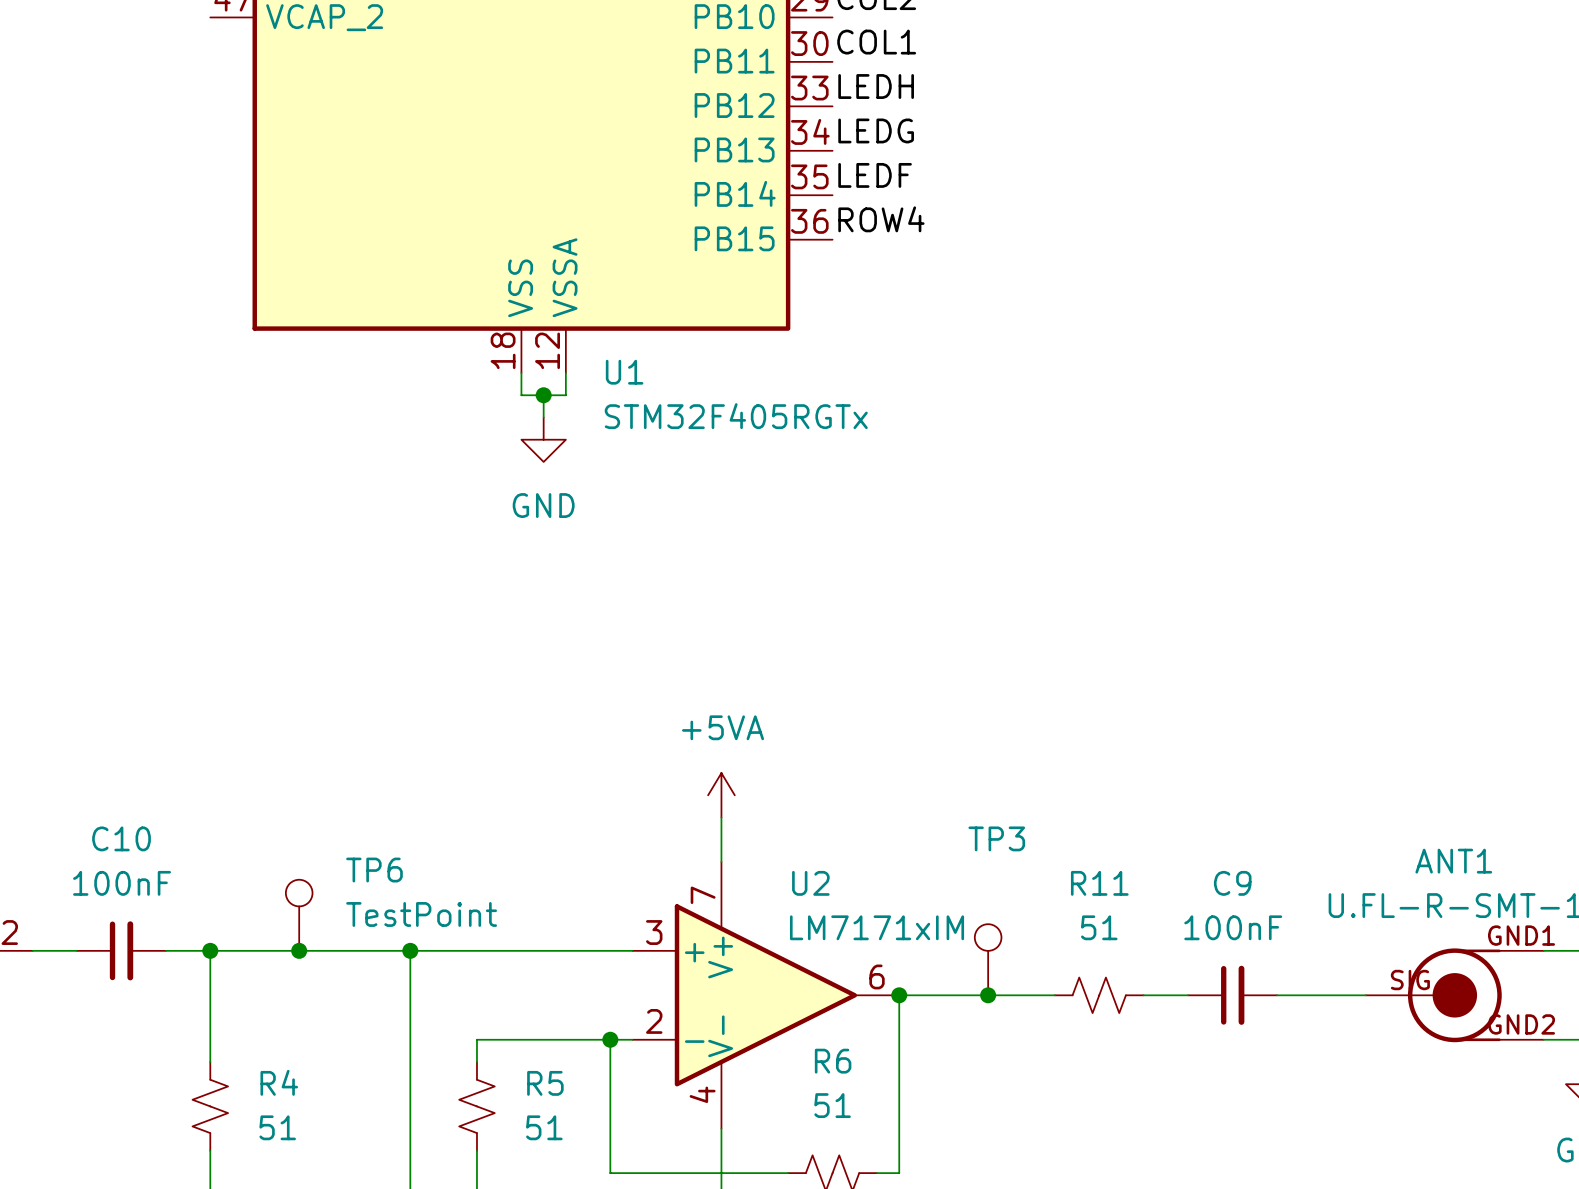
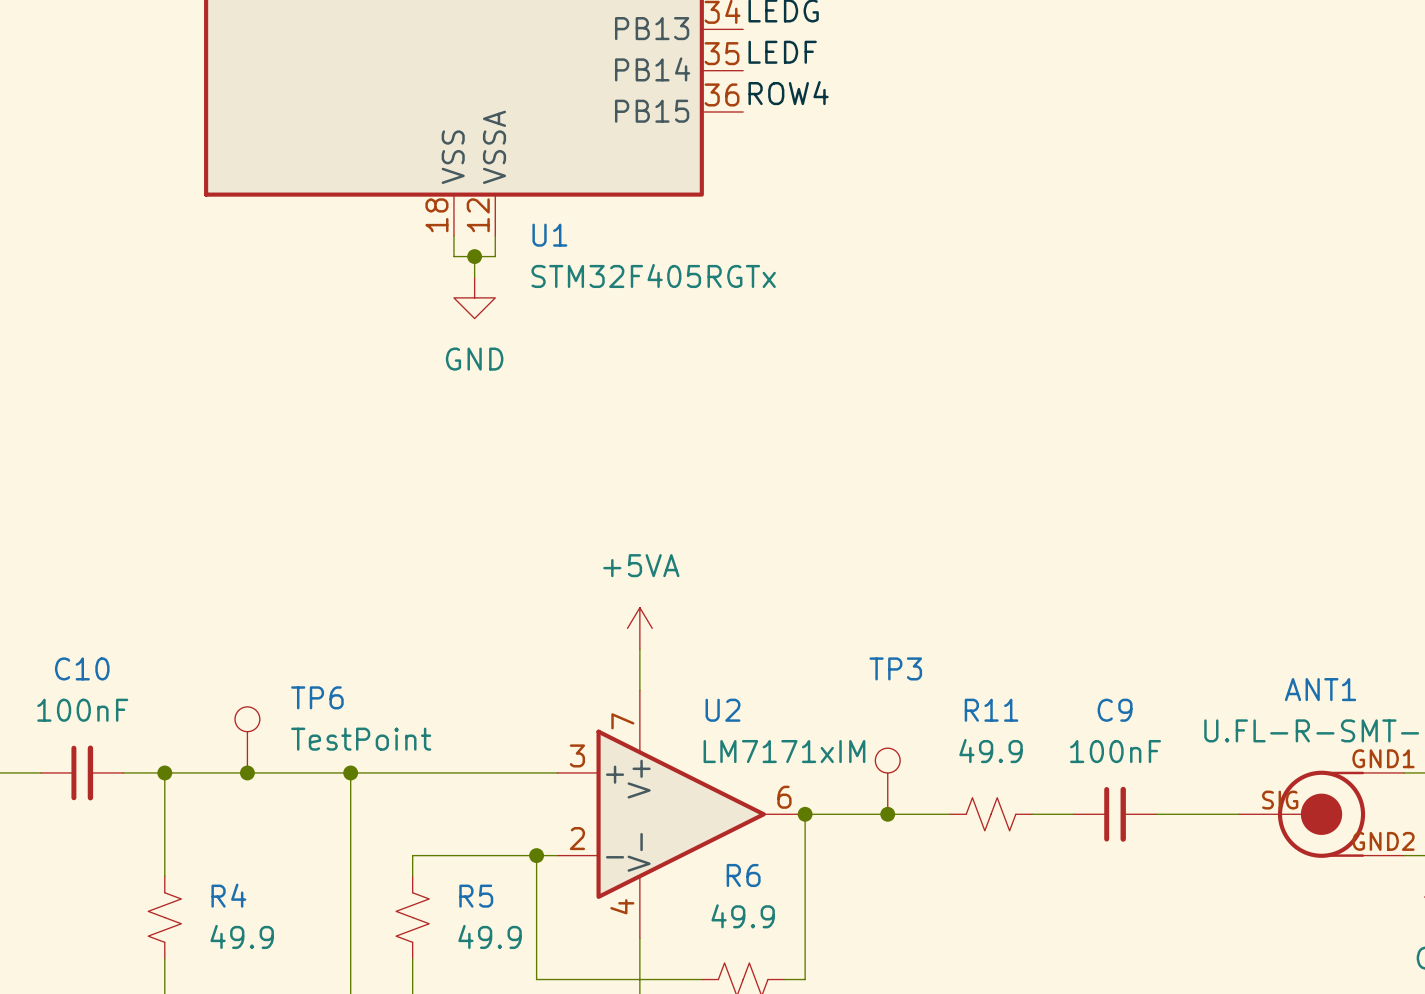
R11 value: 51 (1099, 927) -> 49.9 (991, 751)
R6 value: 51 (832, 1105) -> 49.9 (743, 916)
R4 value: 51 (277, 1127) -> 49.9 (242, 936)
R5 value: 51 (544, 1127) -> 49.9 (490, 936)

